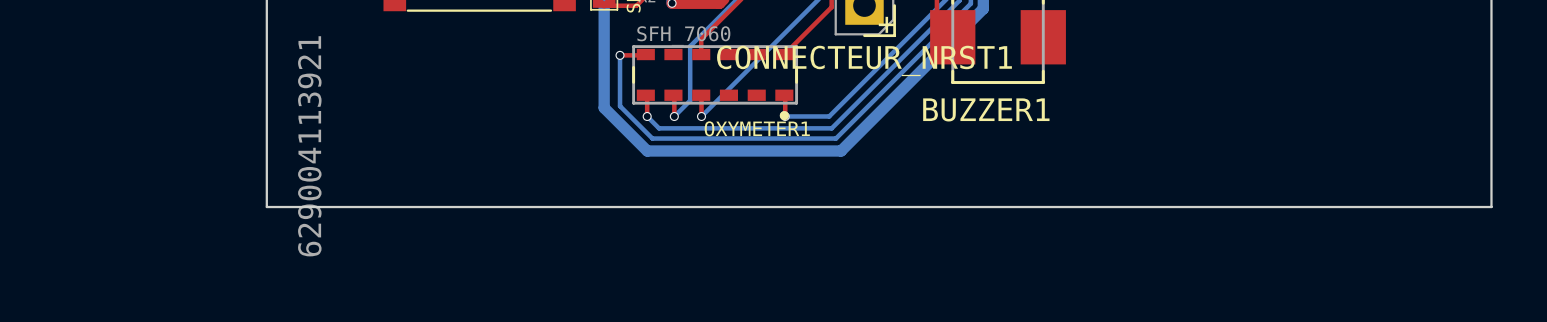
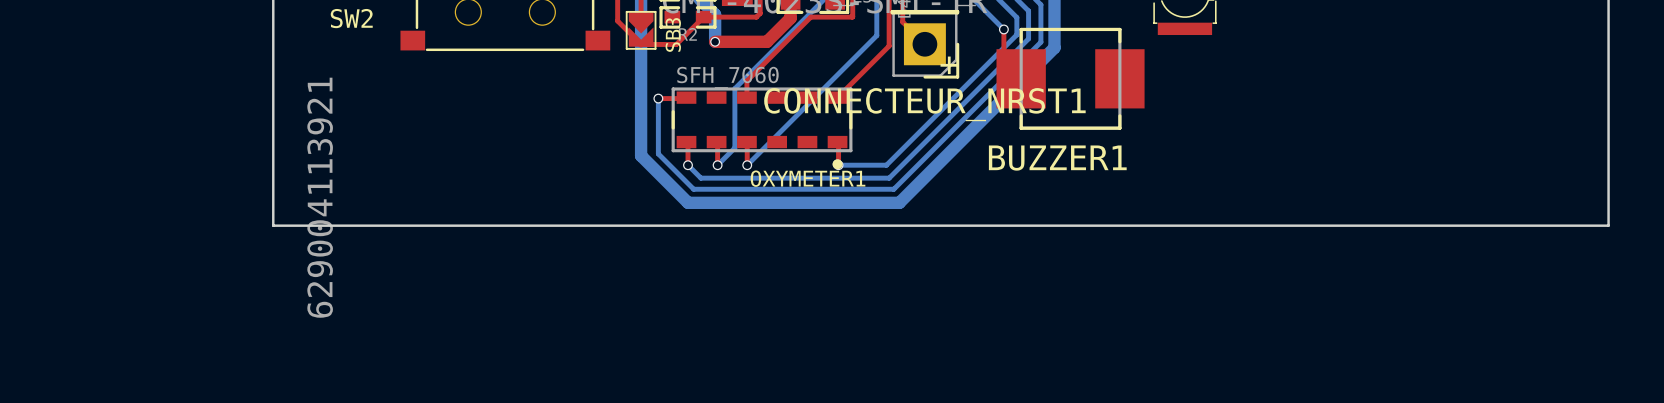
board edge: (266, 171) (266, 207) (1491, 207) (1491, 171) -> (273, 225) (1608, 225)

